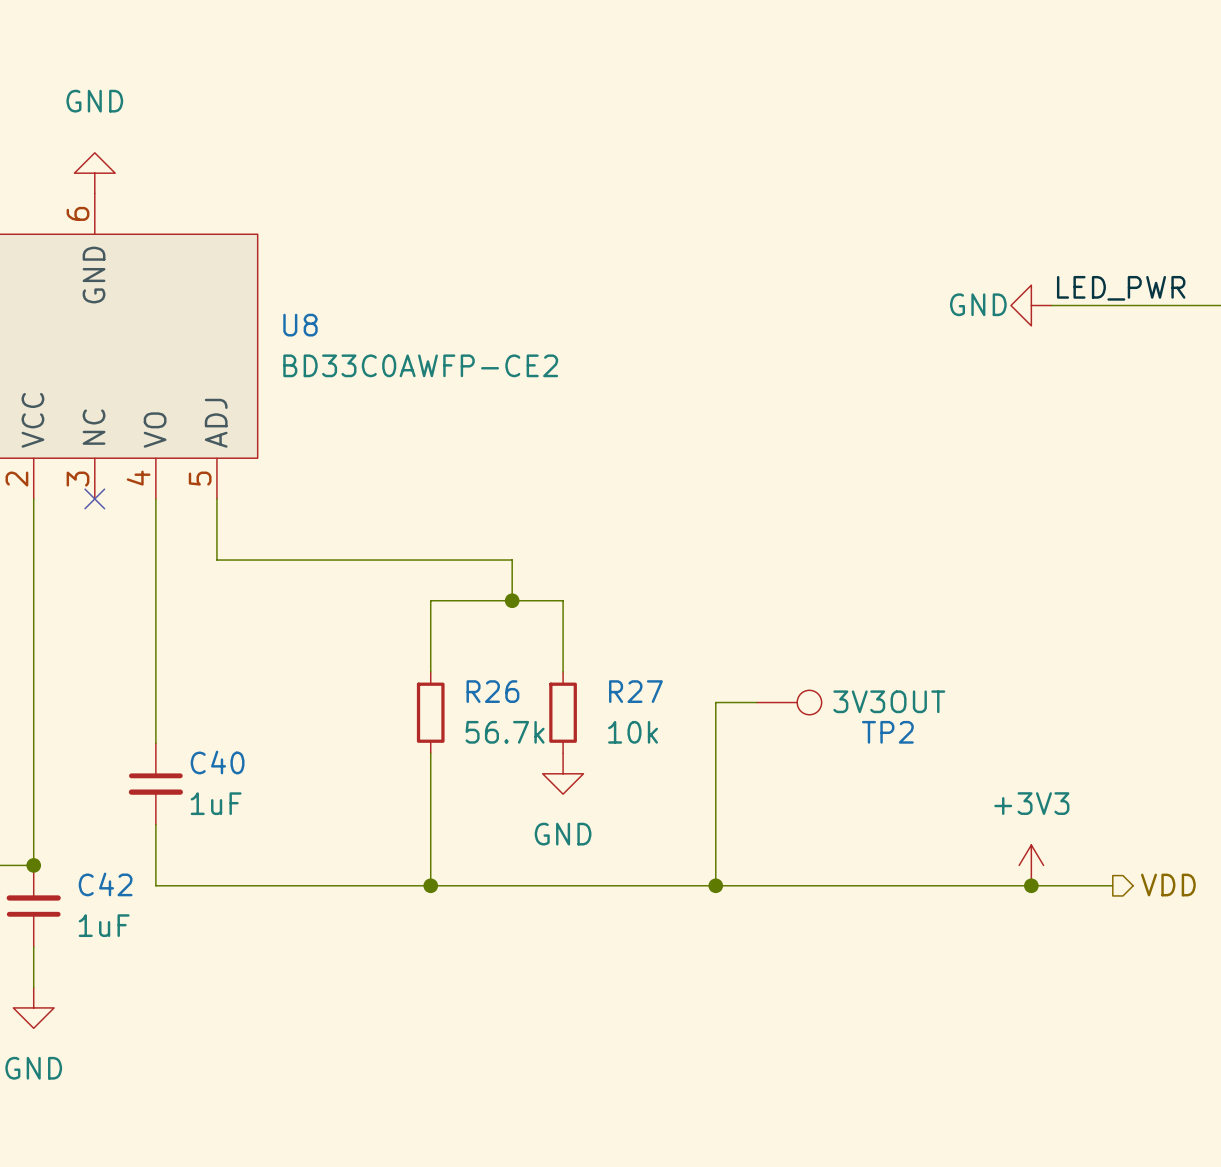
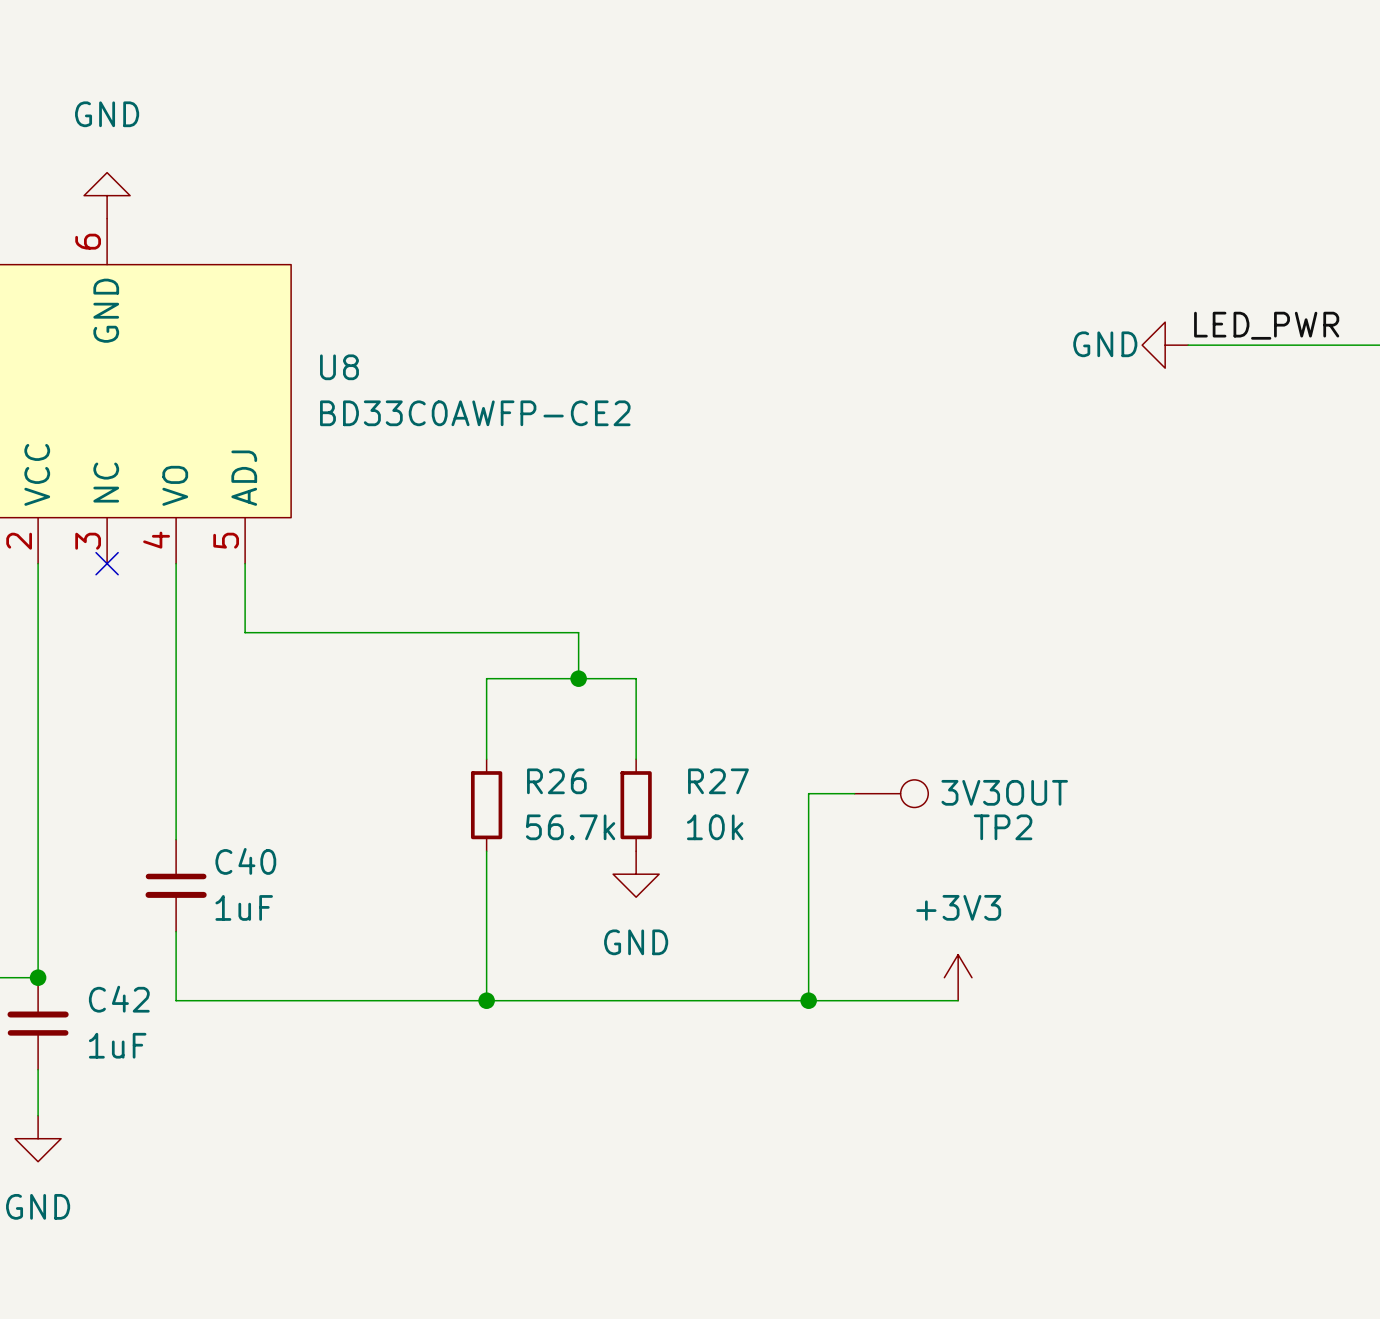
power symbol position: +3V3 (1031, 865) -> +3V3 (958, 977)
wire: (848, 885) (1112, 885) -> none
junction: (1031, 885) -> none
hierarchical label: VDD (1168, 885) -> none

